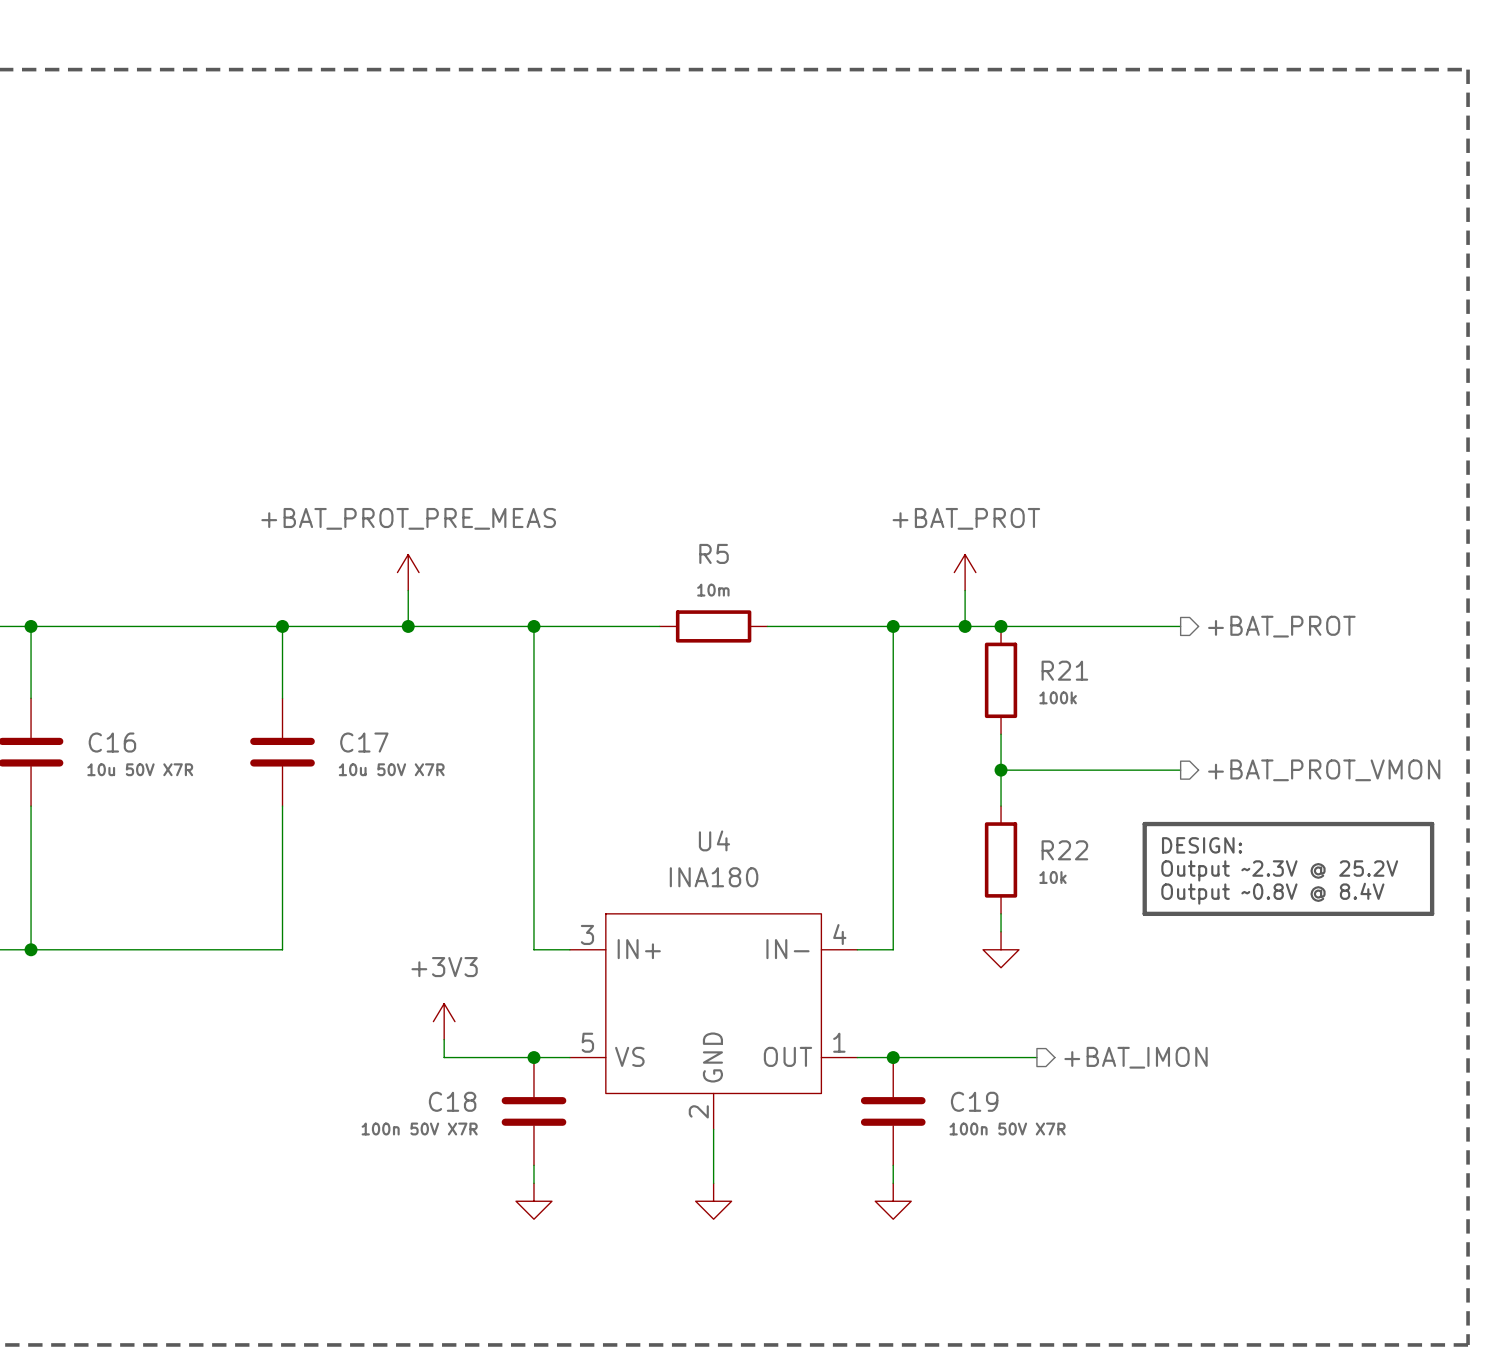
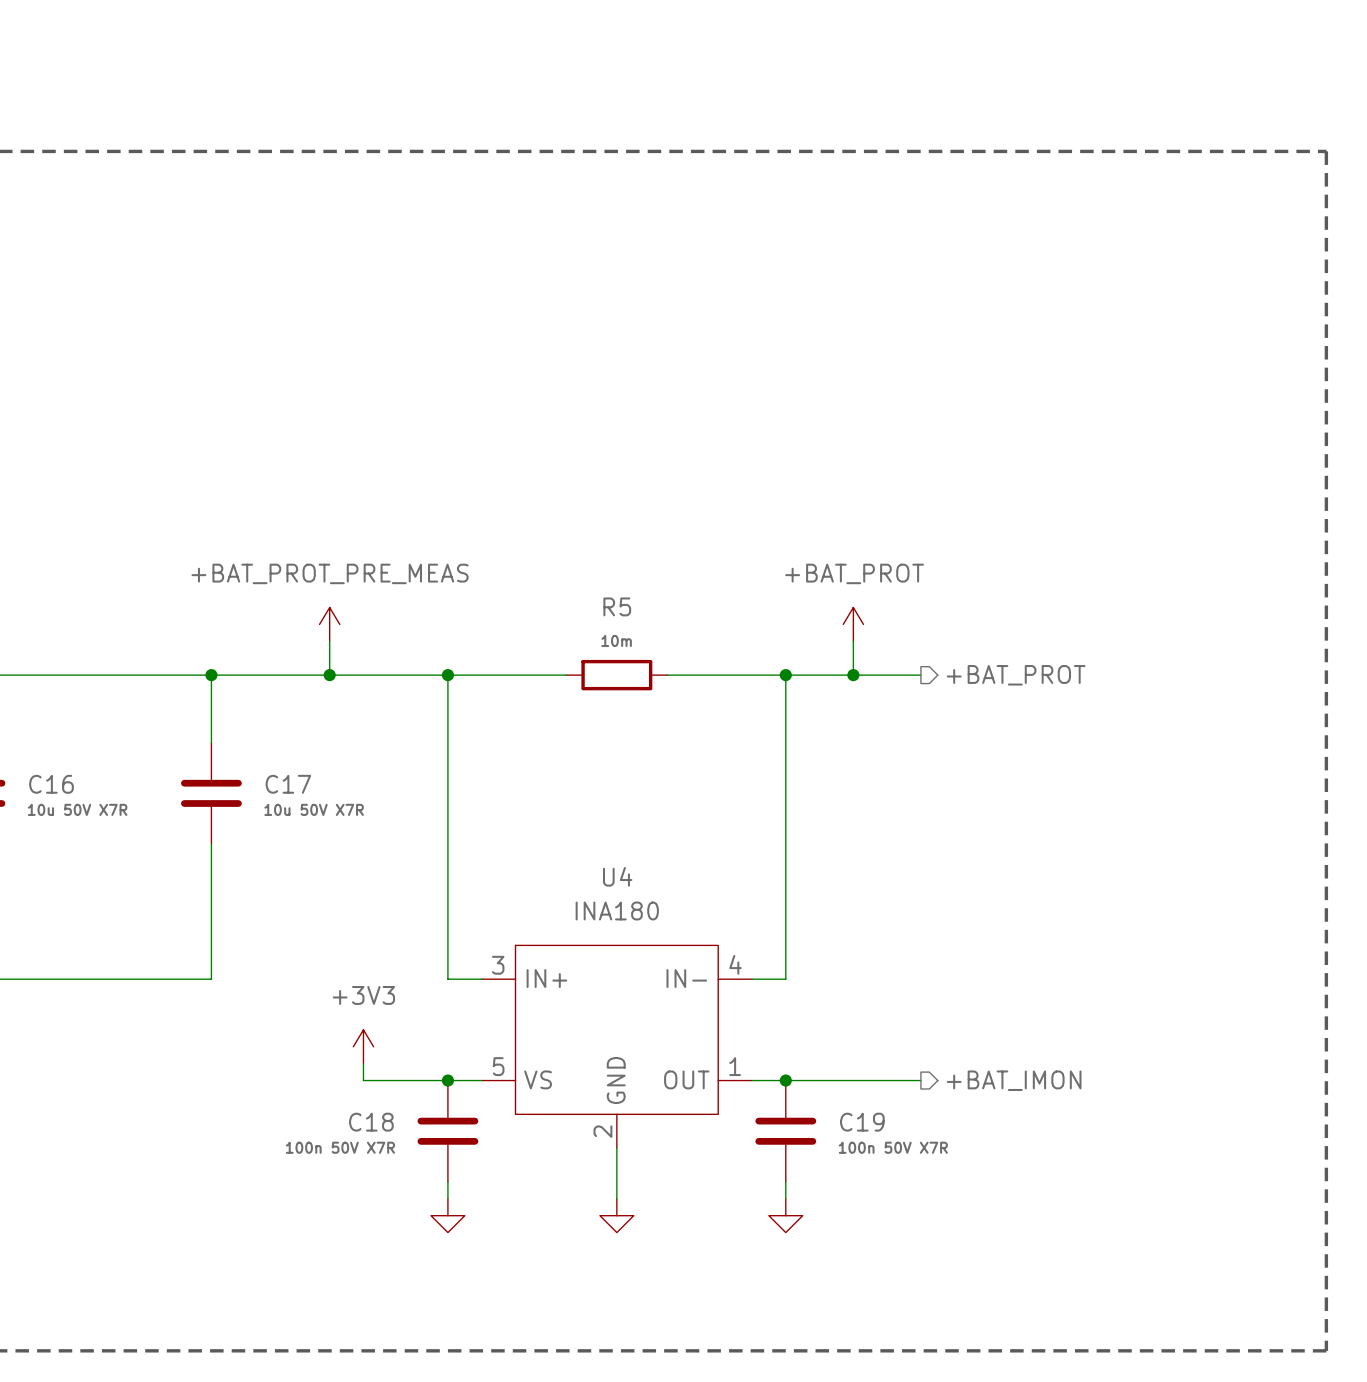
junction: (1001, 626) -> none
wire: (1036, 626) (1180, 626) -> none
hierarchical label position: +BAT_PROT (1281, 626) -> +BAT_PROT (1016, 675)
R21: 100k (1001, 680) -> none
wire: (1001, 734) (1001, 806) -> none
wire: (1001, 770) (1180, 770) -> none
junction: (1001, 770) -> none
hierarchical label: +BAT_PROT_VMON (1324, 770) -> none
line: (1144, 824) (1432, 824) (1432, 913) (1144, 913) (1144, 824) -> none
text: DESIGN: (1202, 845) -> none
R22: 10k (1001, 859) -> none
text: Output ~2.3V @ 25.2V (1279, 870) -> none
text: Output ~0.8V @ 8.4V (1272, 893) -> none
wire: (1001, 913) (1001, 931) -> none
power symbol: (1001, 949) -> none

